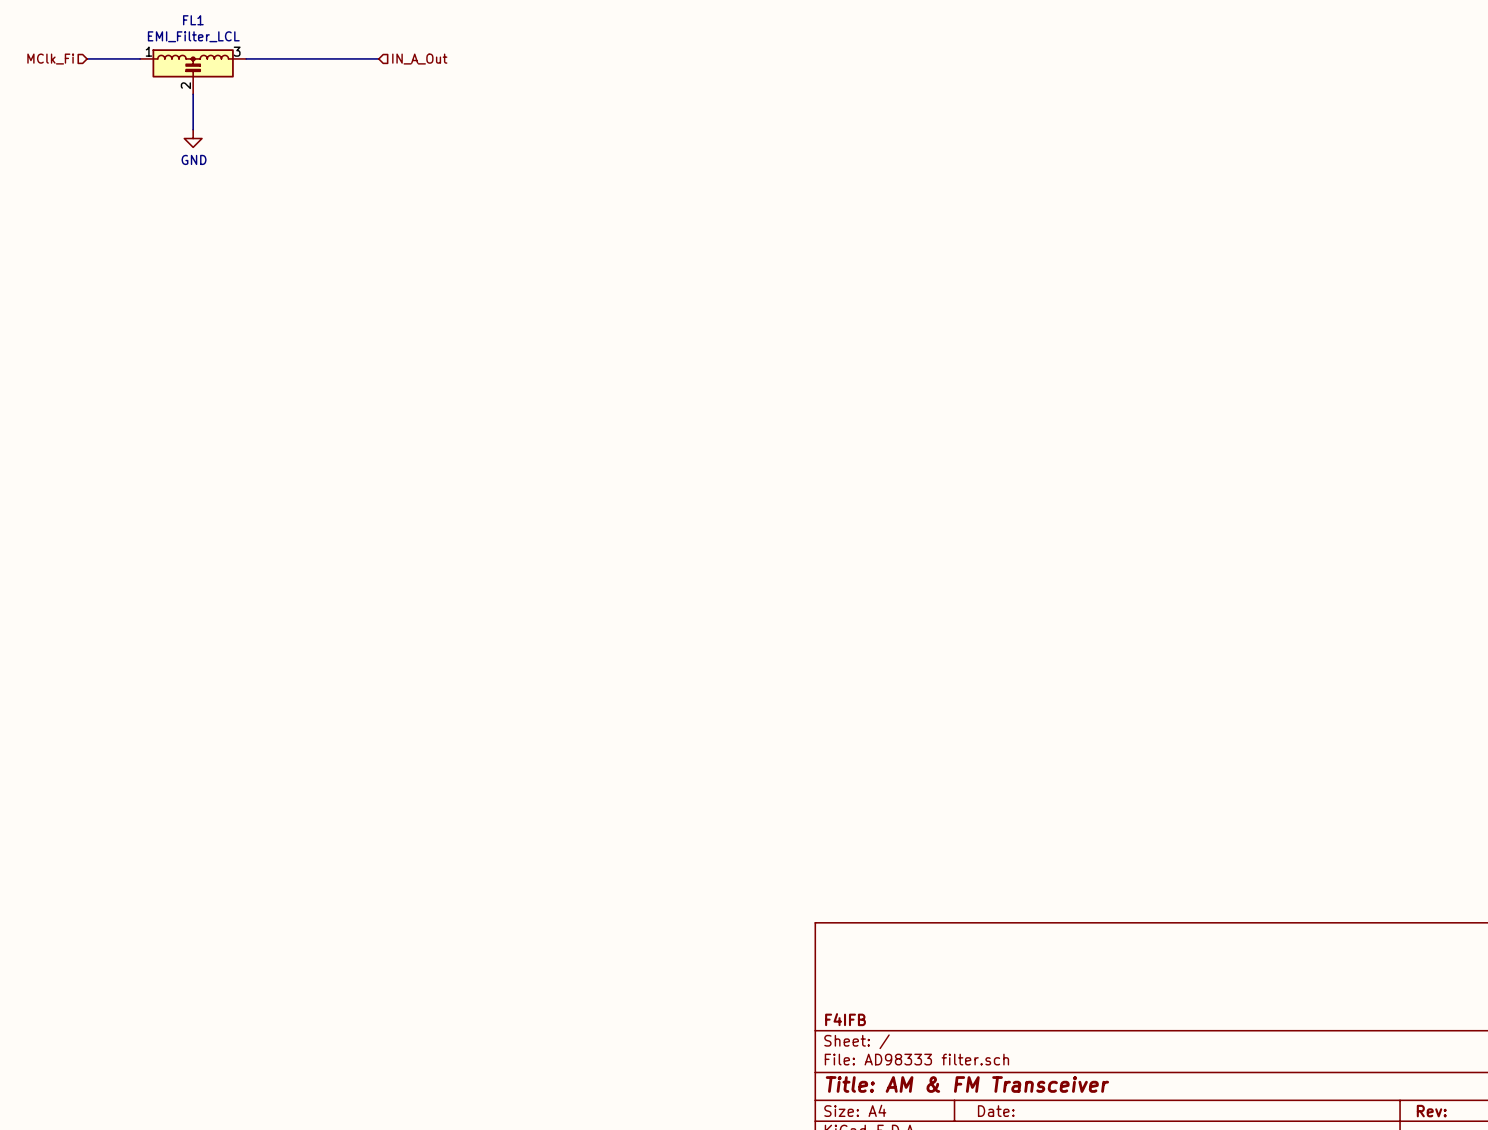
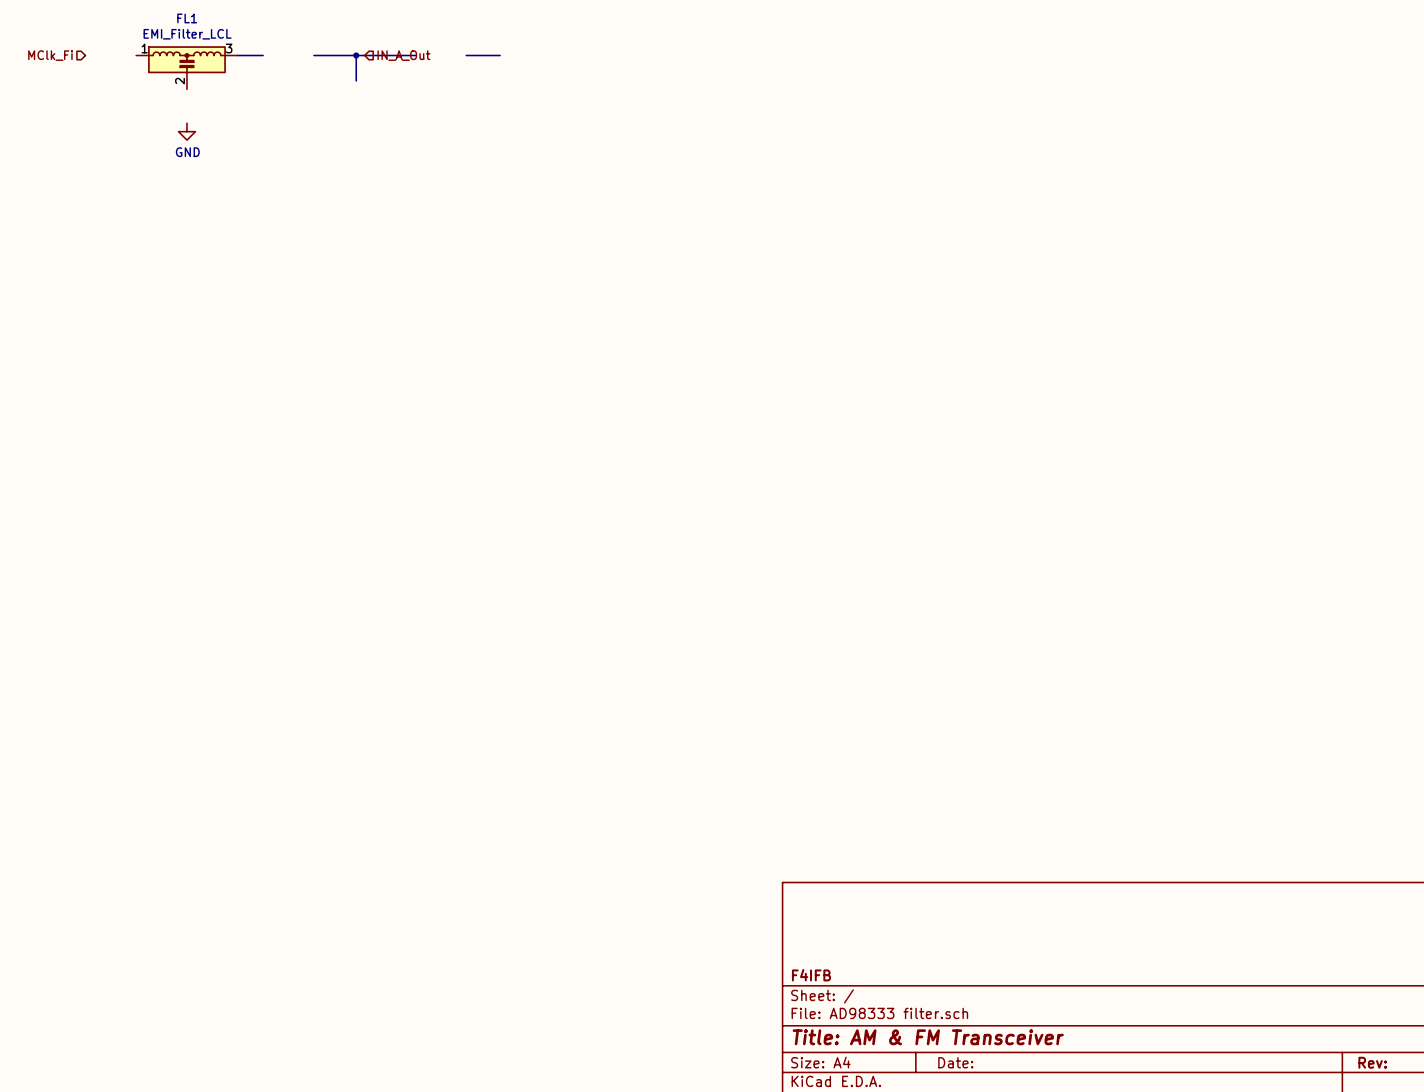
wire: (87, 58) (140, 58) -> none
wire: (272, 58) (325, 58) -> (364, 55) (415, 55)
wire: none -> (356, 55) (356, 80)
junction: none -> (356, 55)
wire: none -> (466, 55) (500, 55)
wire: (193, 94) (193, 129) -> none

